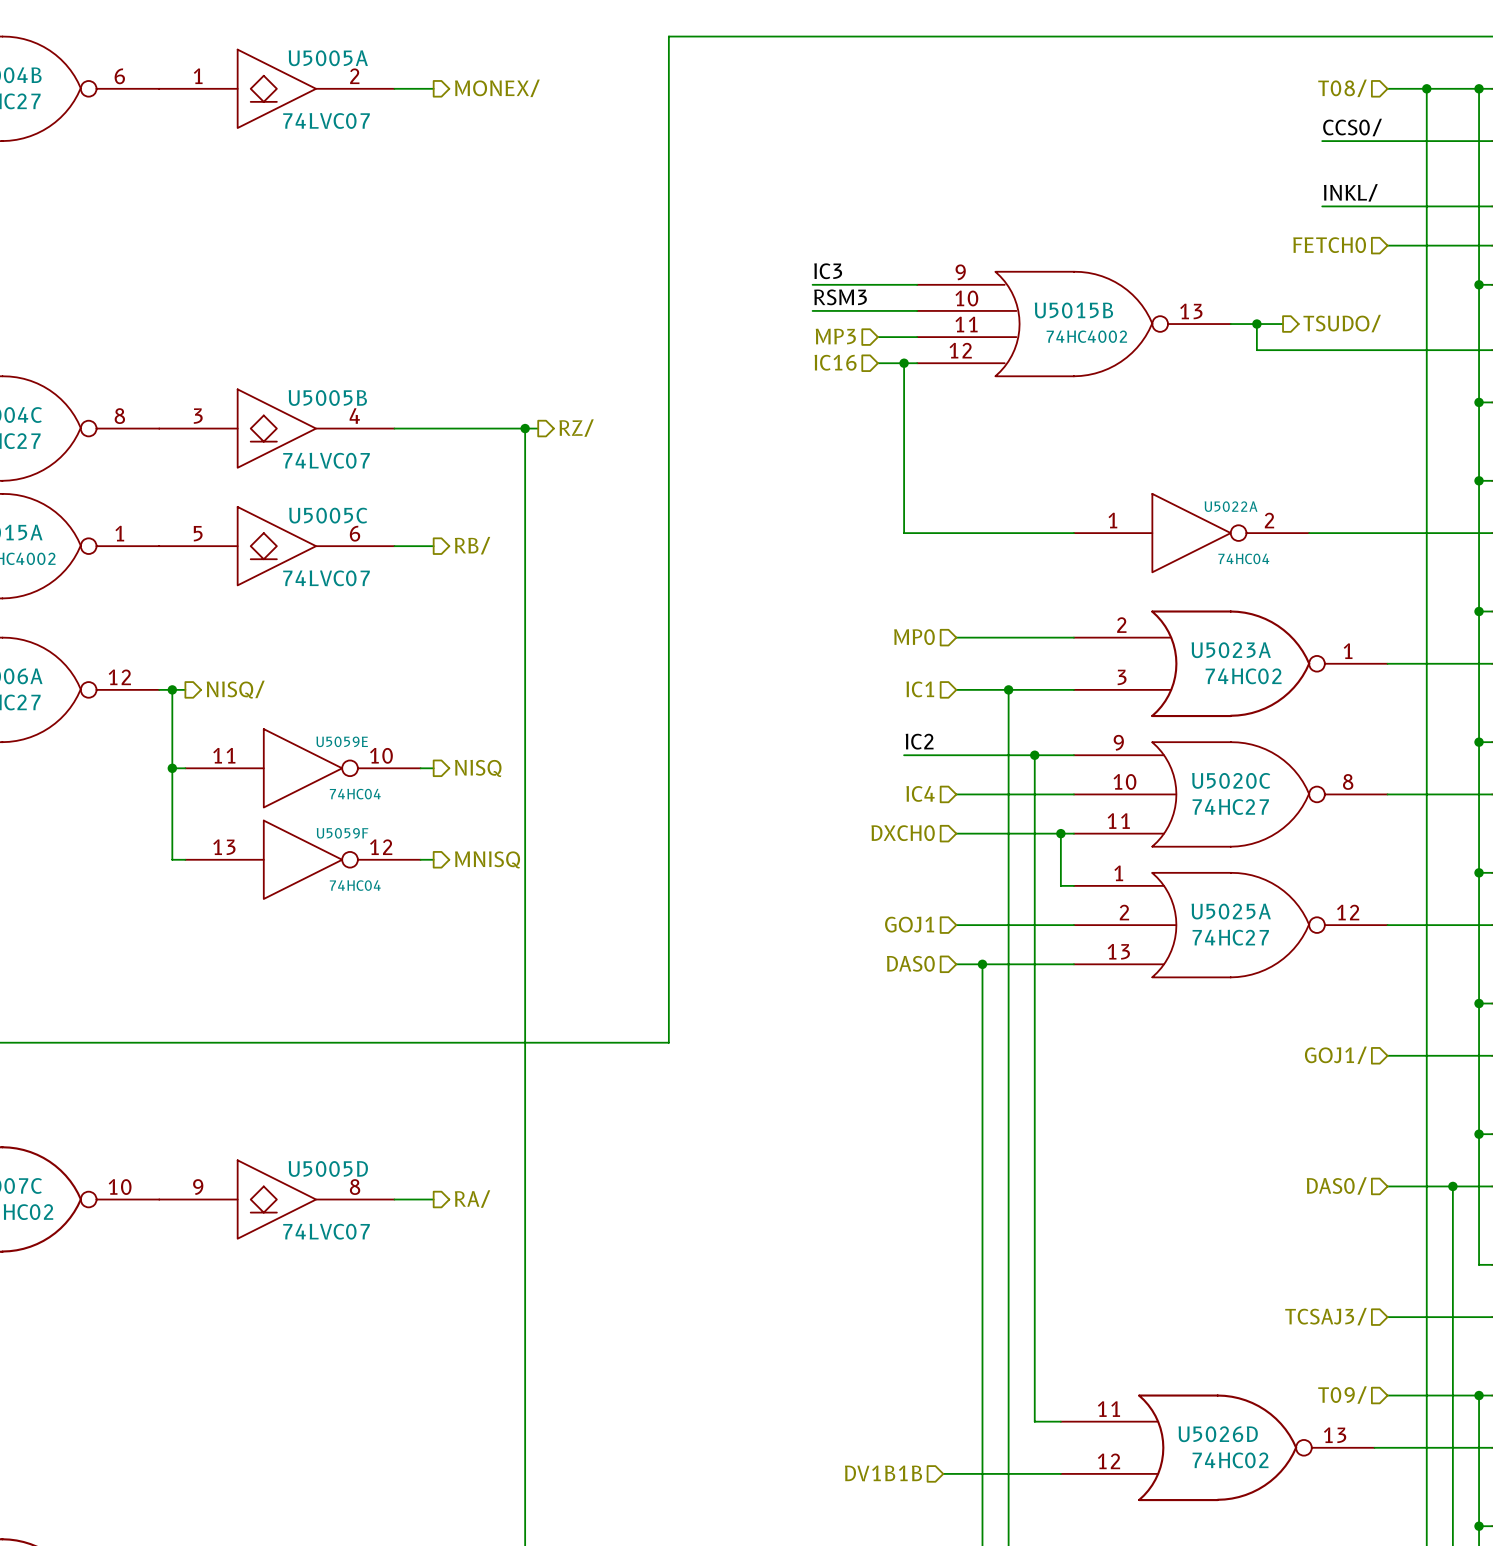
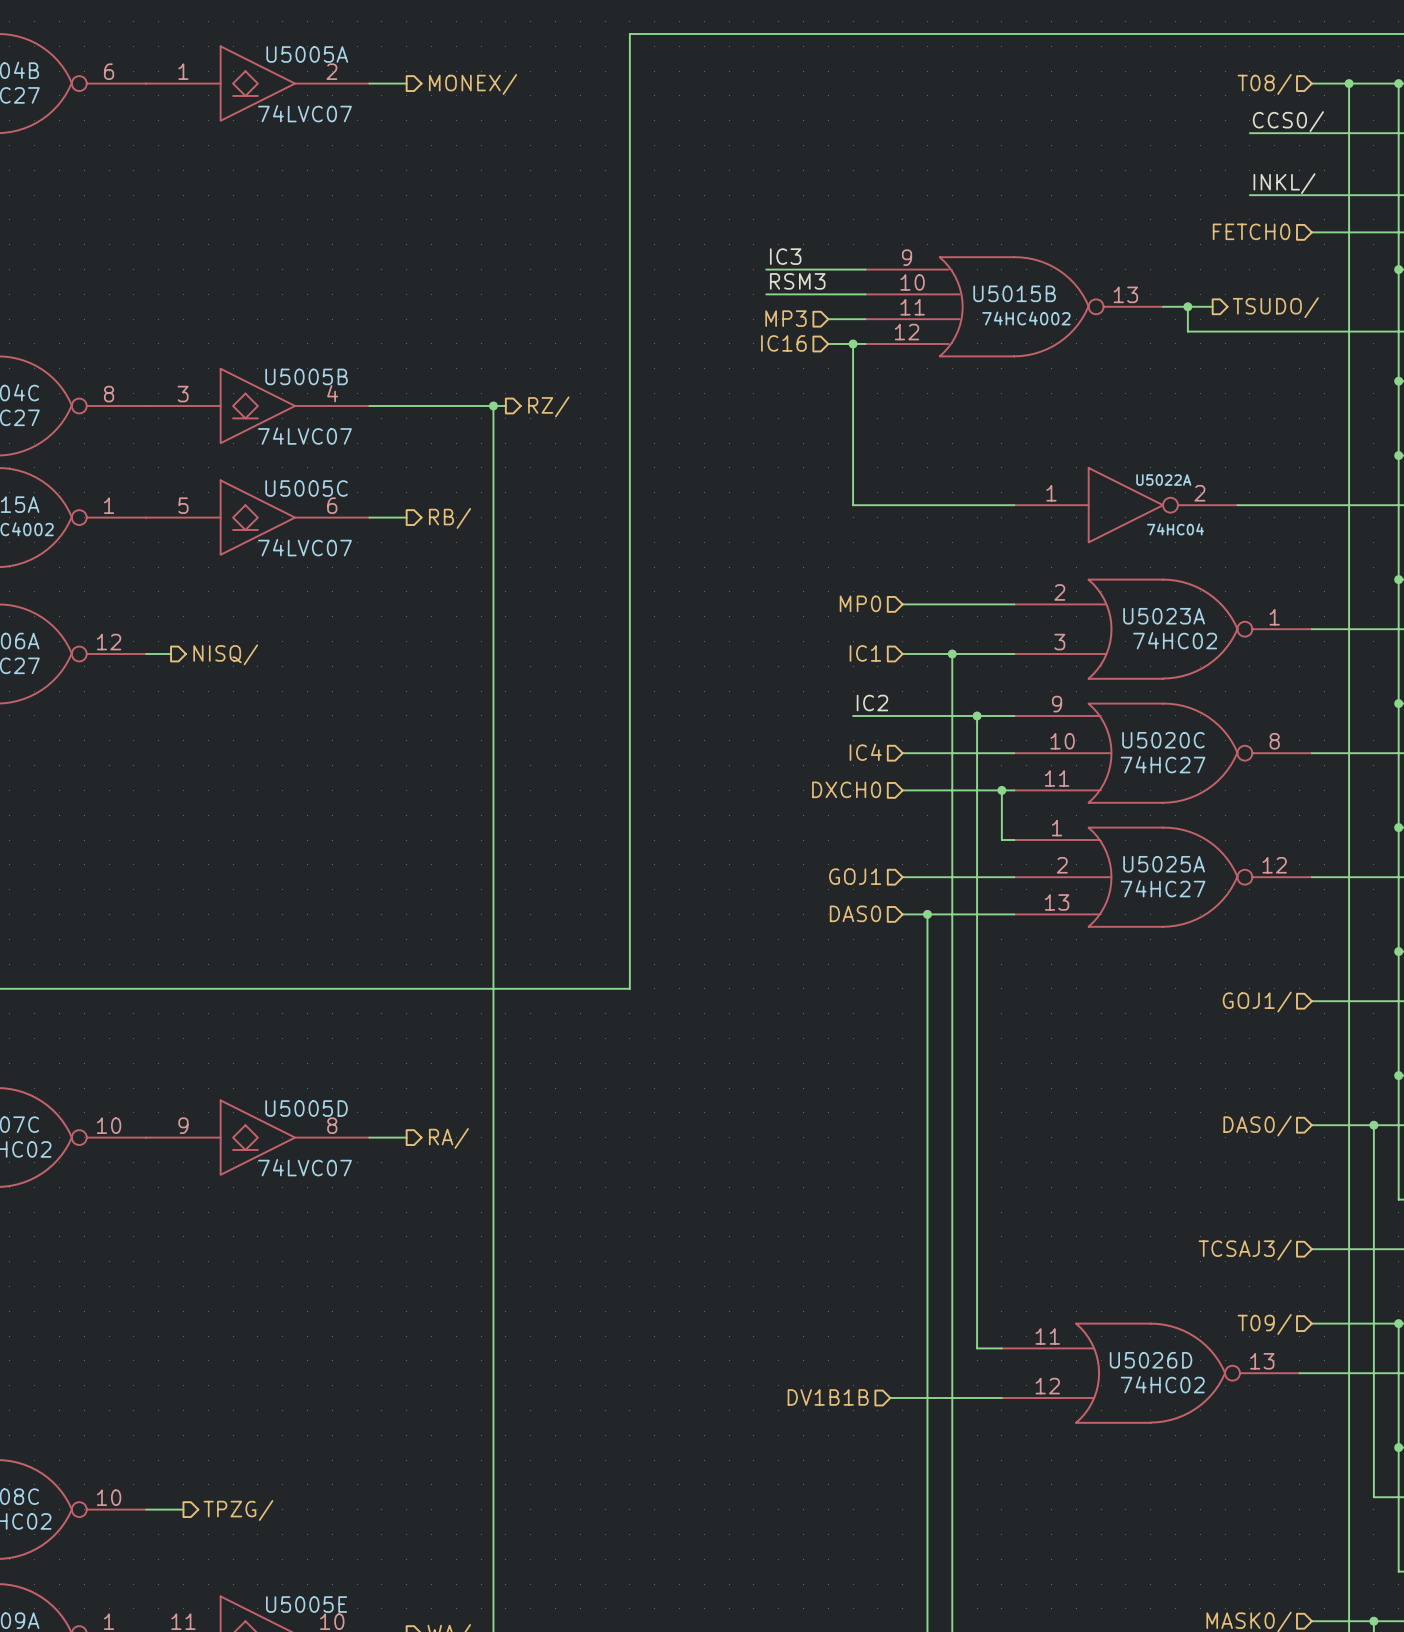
wire: (172, 689) (172, 859) (185, 859) -> none
junction: (172, 689) -> none
wire: (172, 768) (185, 768) -> none
junction: (172, 768) -> none
U5059E: 74HC04 (302, 768) -> none
wire: (420, 768) (433, 768) -> none
hierarchical label: NISQ (478, 768) -> none
U5059F: 74HC04 (302, 859) -> none
wire: (420, 859) (433, 859) -> none
hierarchical label: MNISQ (487, 859) -> none

